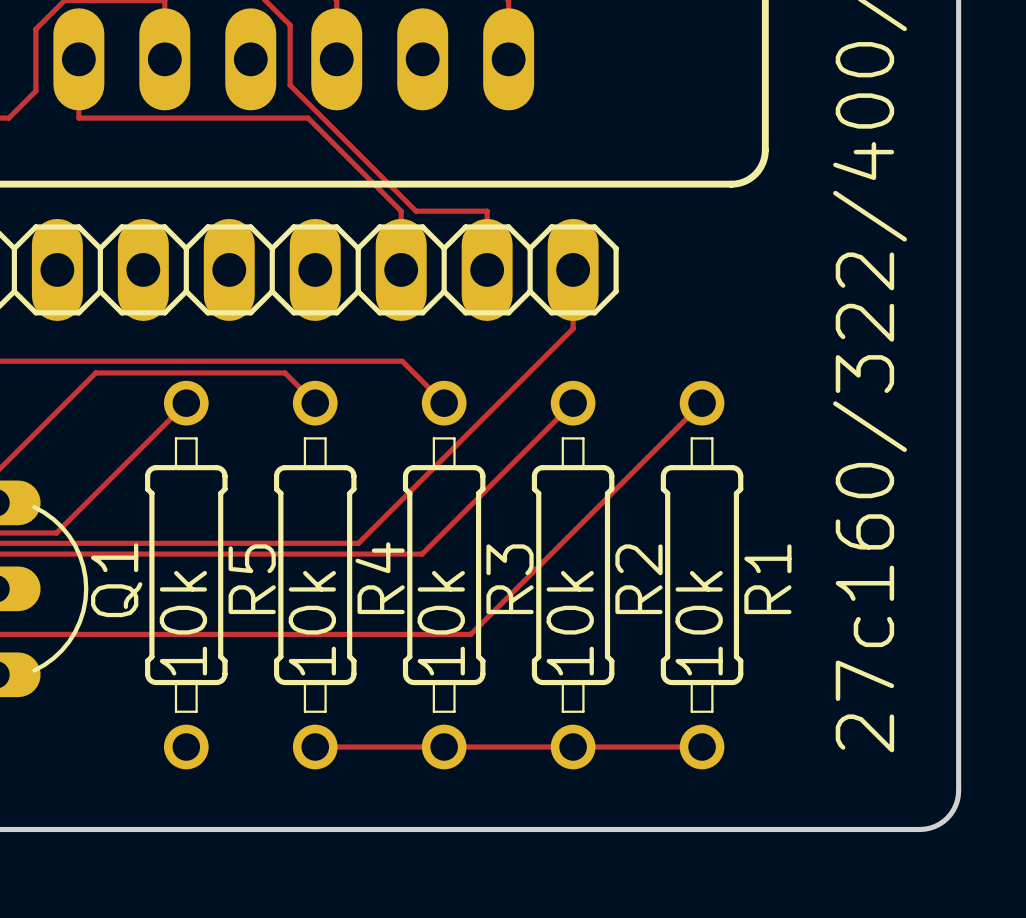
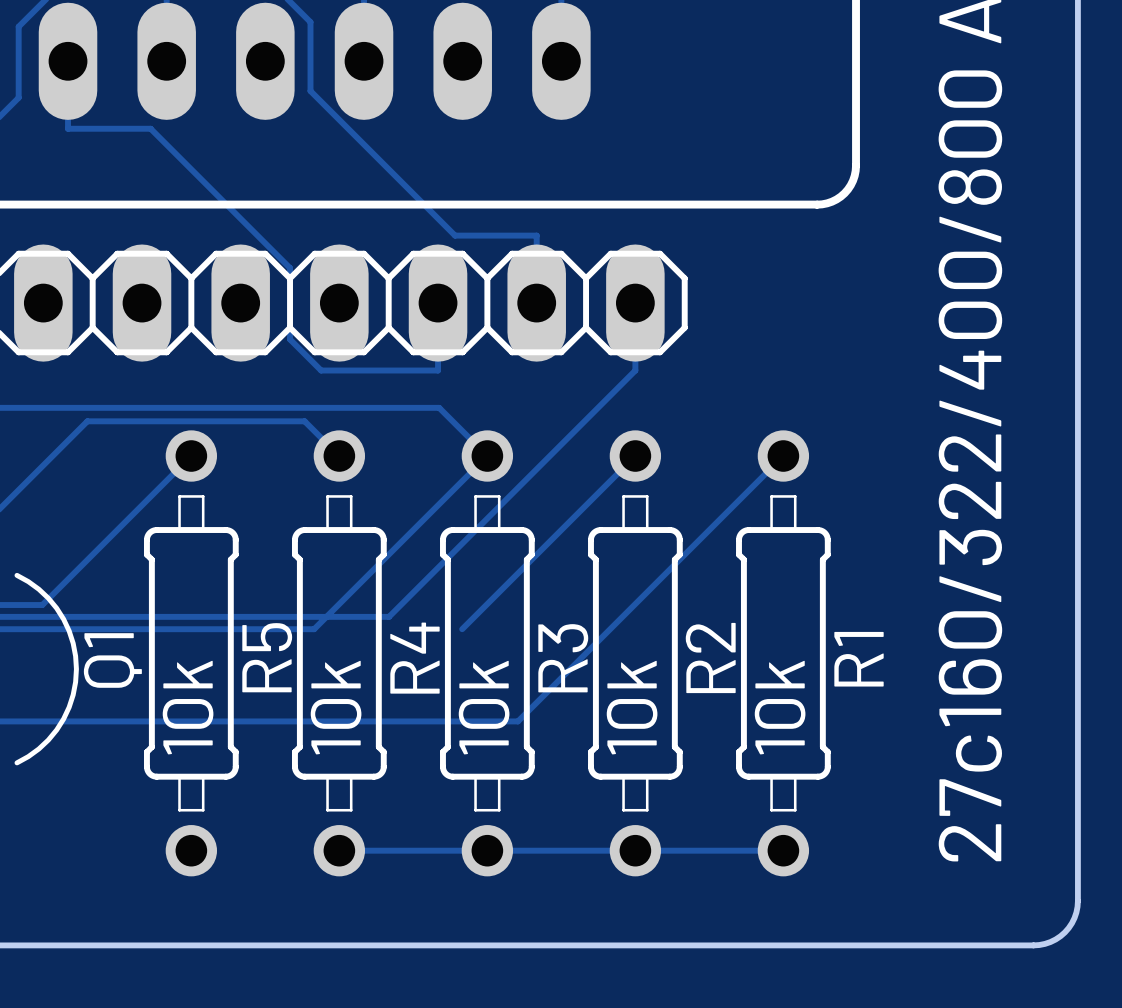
track: (150, 118) (308, 118) (401, 211) (401, 269) -> (150, 128) (290, 268) (290, 339) (321, 370) (438, 370) (438, 303)
track: (293, 554) (422, 554) -> (314, 629) (487, 456)

